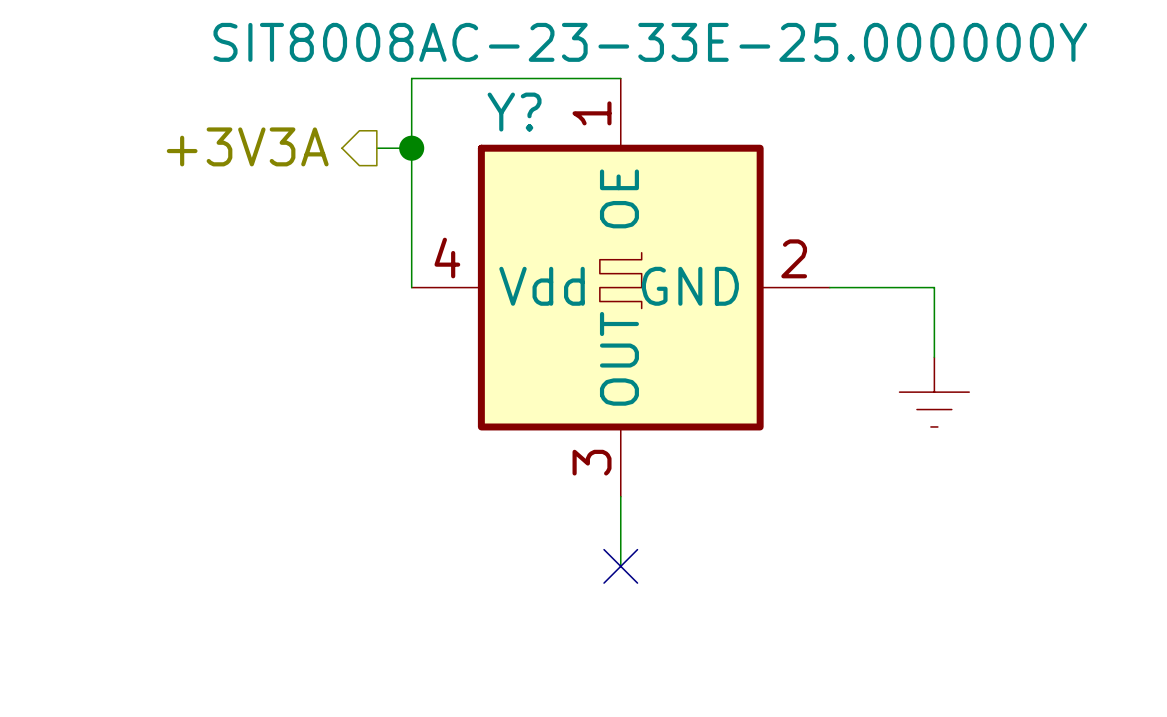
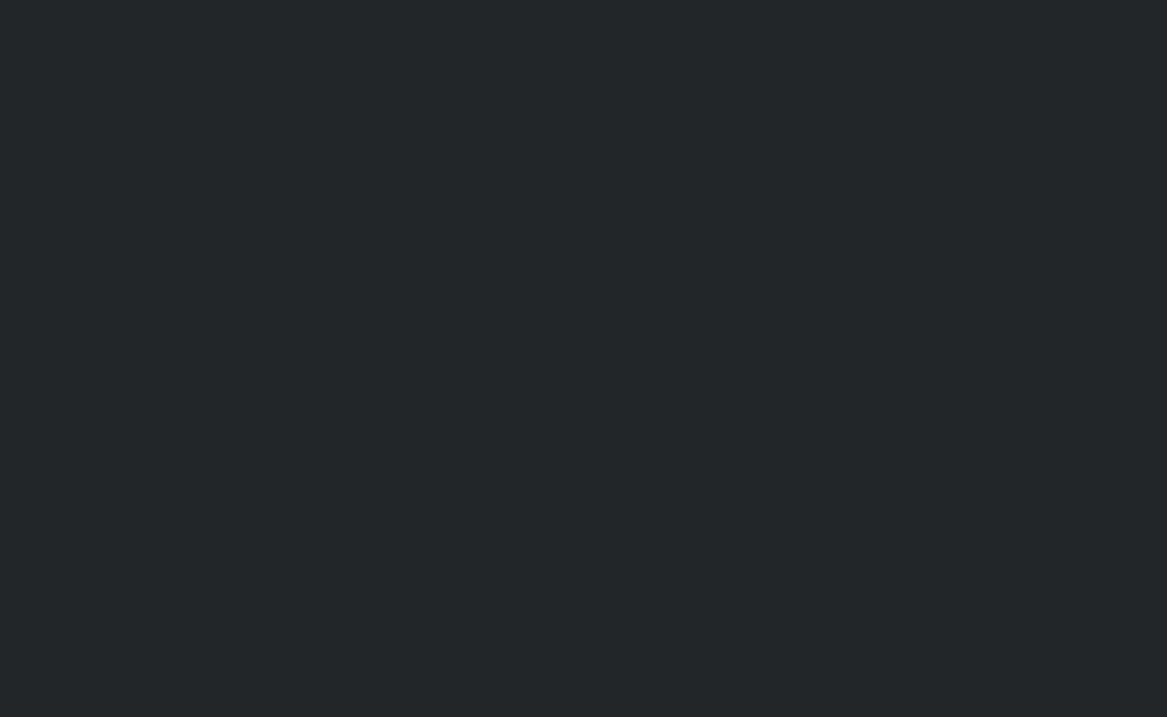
wire: (620, 78) (411, 78) (411, 287) -> none
hierarchical label: +3V3A (247, 146) -> none
wire: (376, 148) (411, 148) -> none
junction: (411, 148) -> none
Y?: SIT8008AC-23-33E-25.000000Y (620, 287) -> none
wire: (829, 287) (934, 287) (934, 357) -> none
power symbol: (934, 392) -> none
wire: (620, 496) (620, 566) -> none
no-connect mark: (620, 566) -> none

